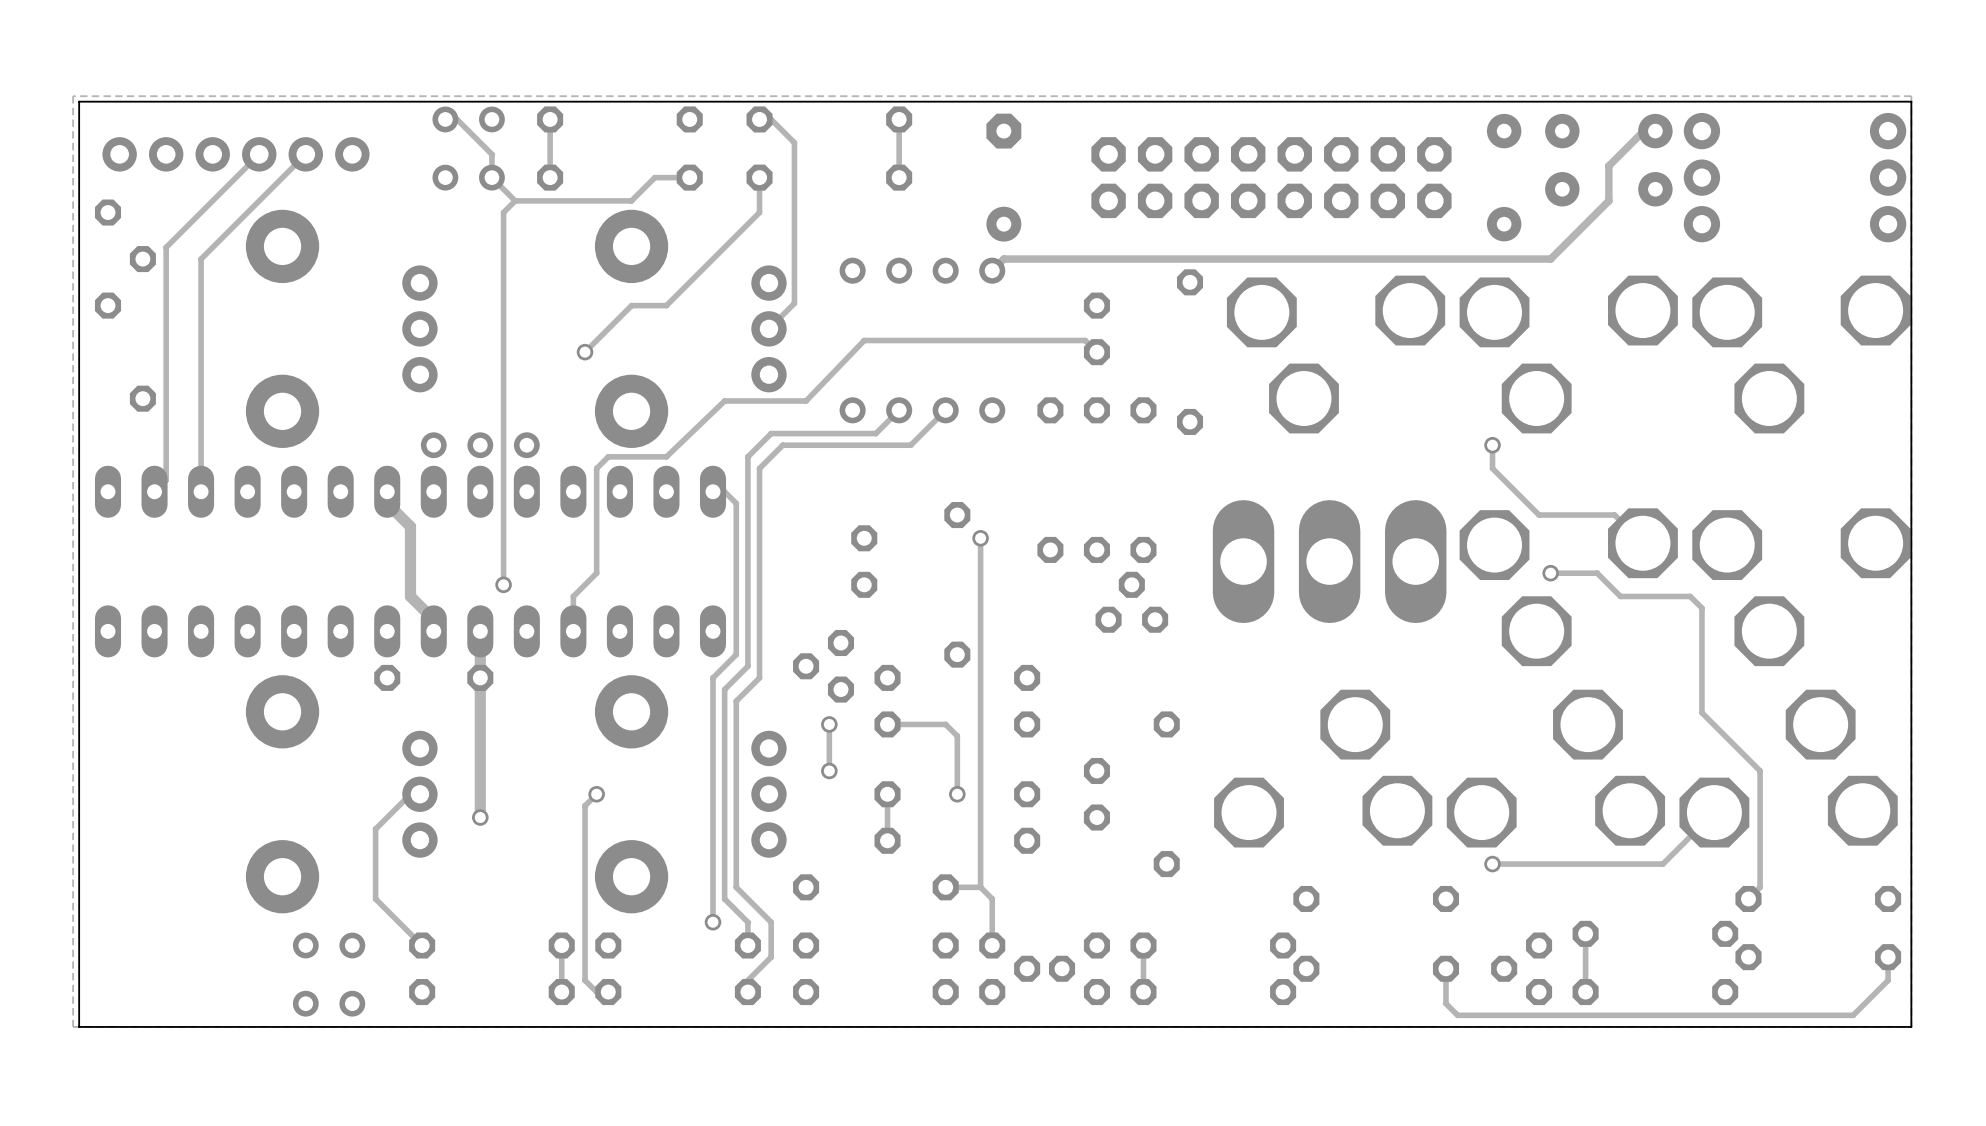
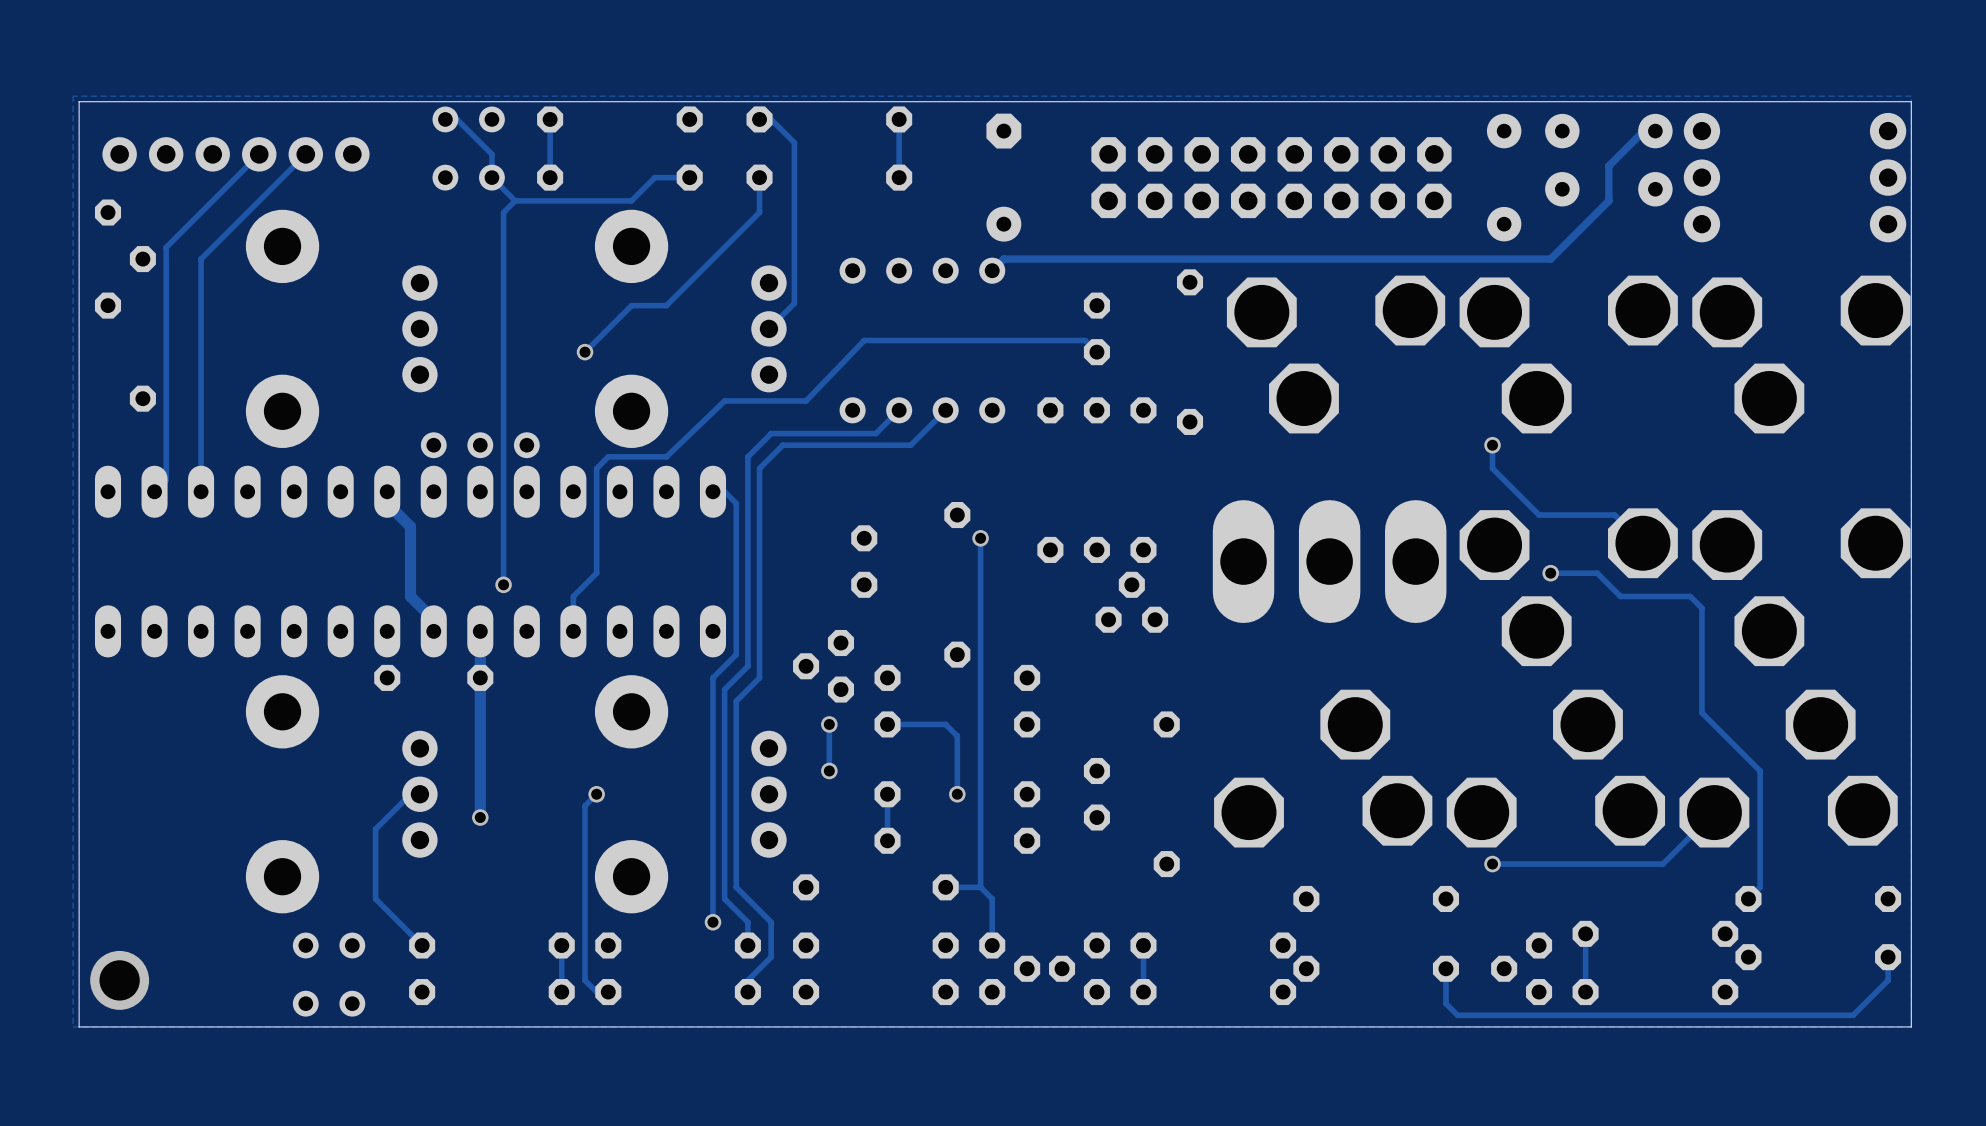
via: none -> (119, 980)

